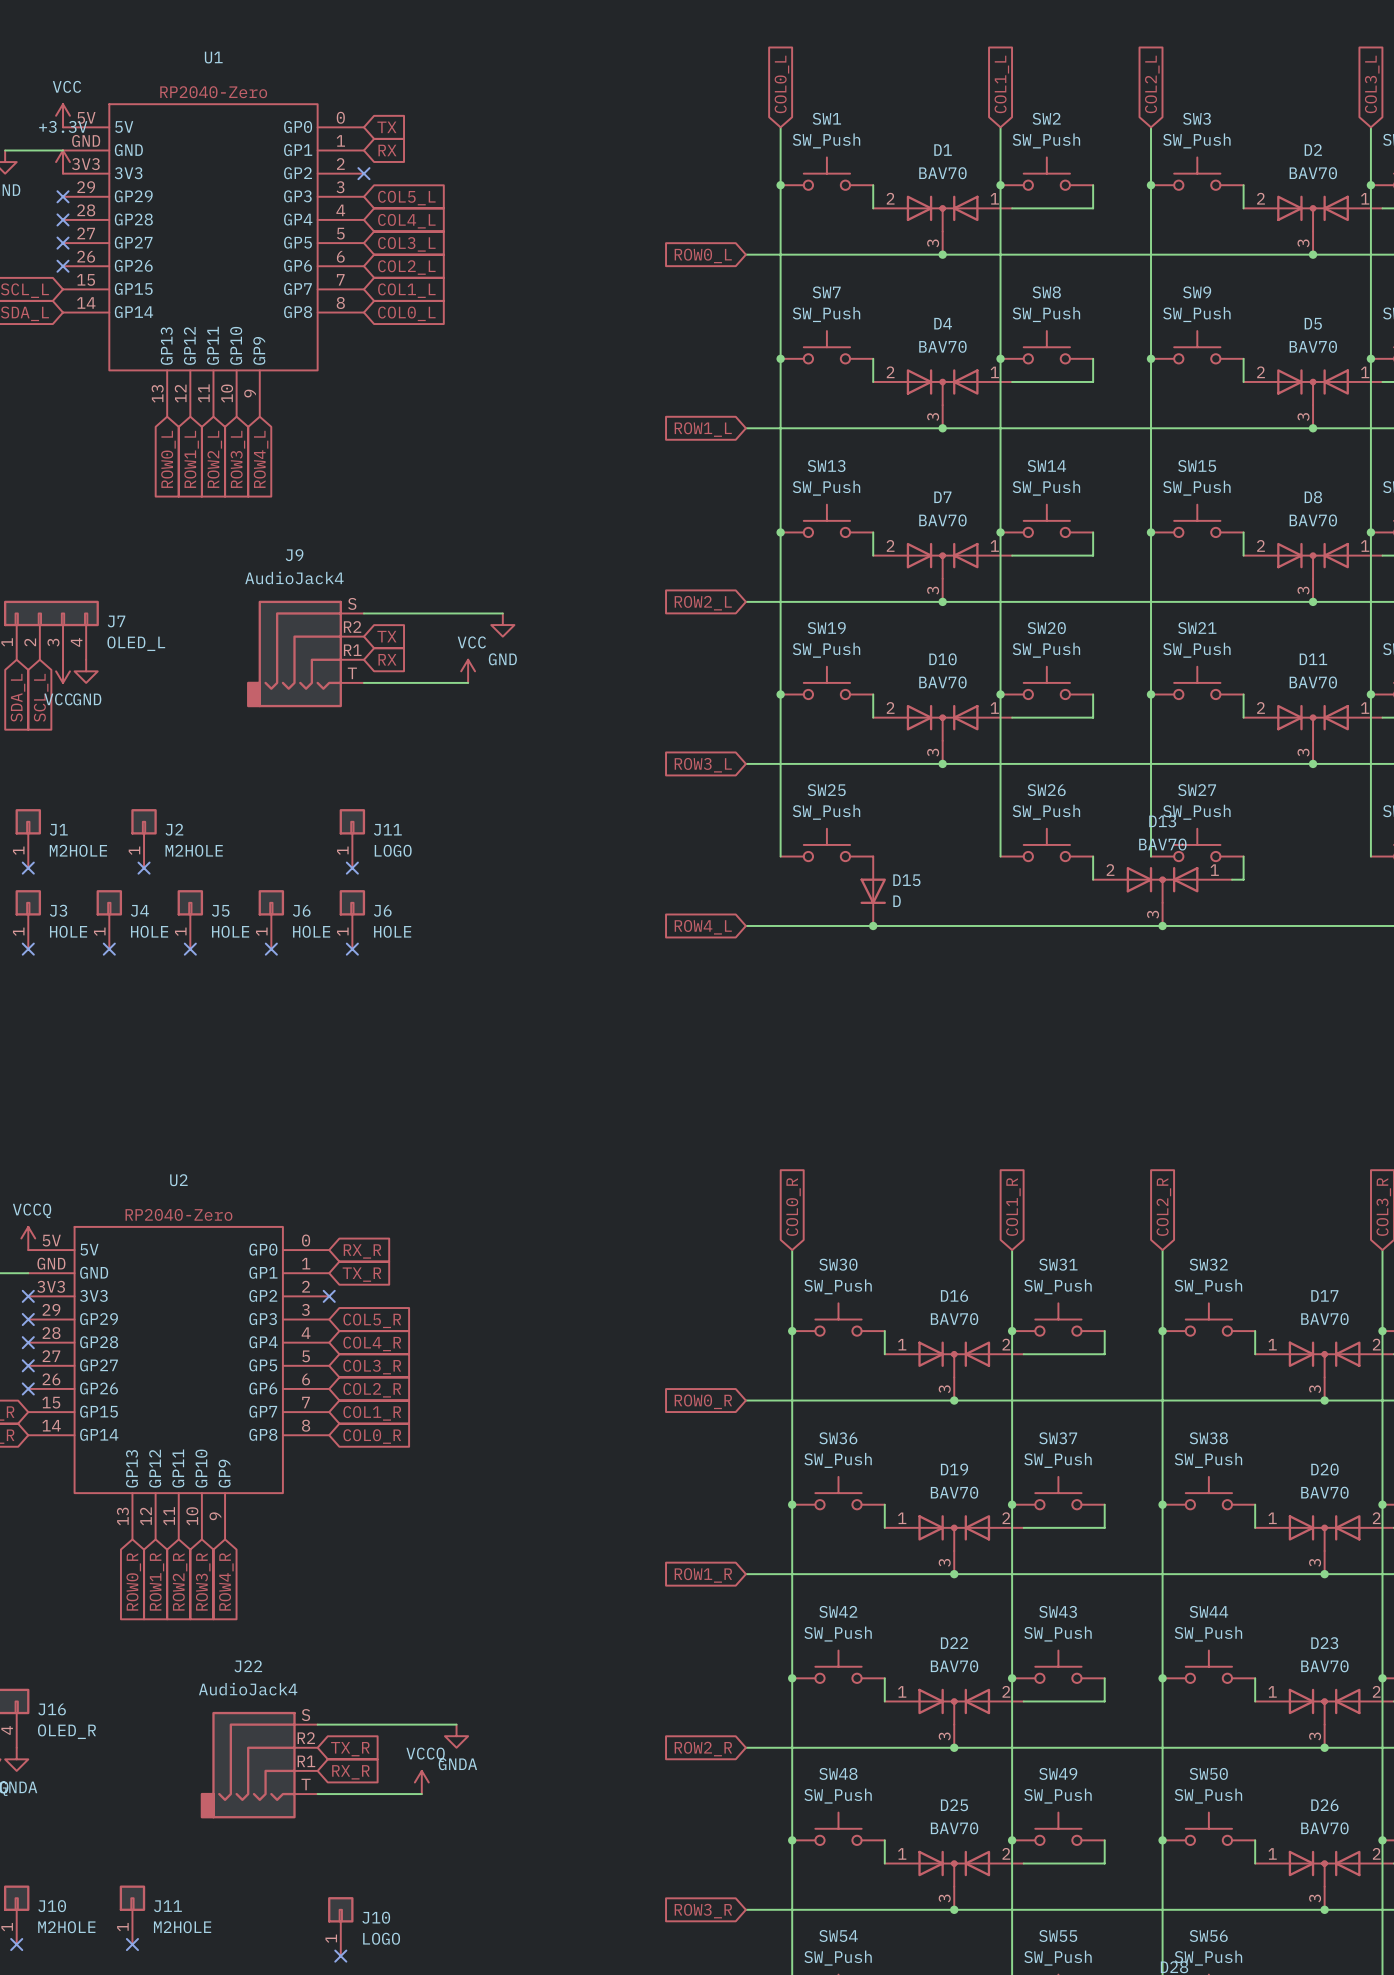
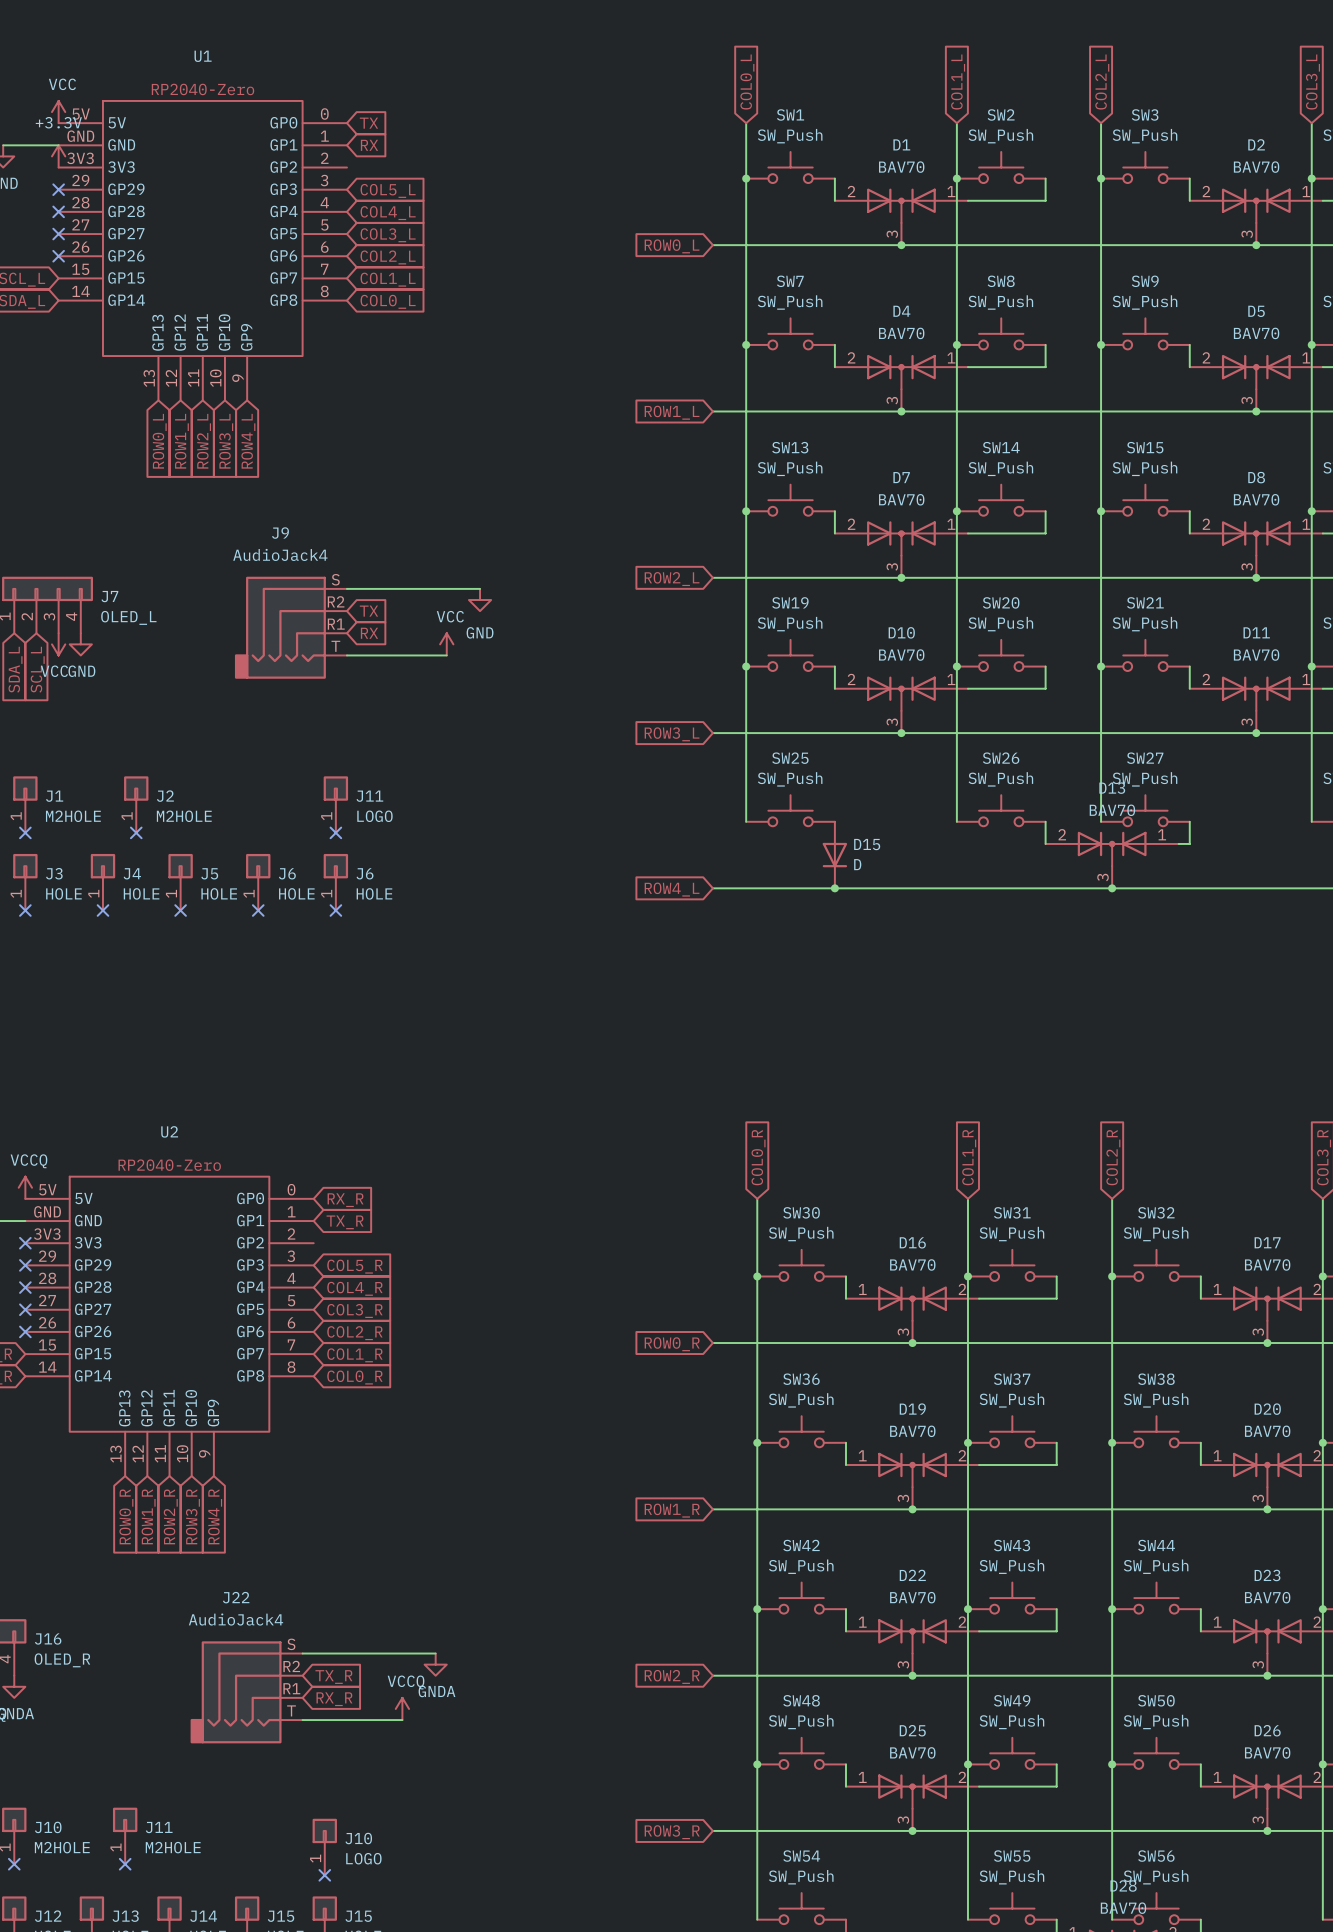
no-connect mark: (363, 173) -> none
no-connect mark: (329, 1296) -> none

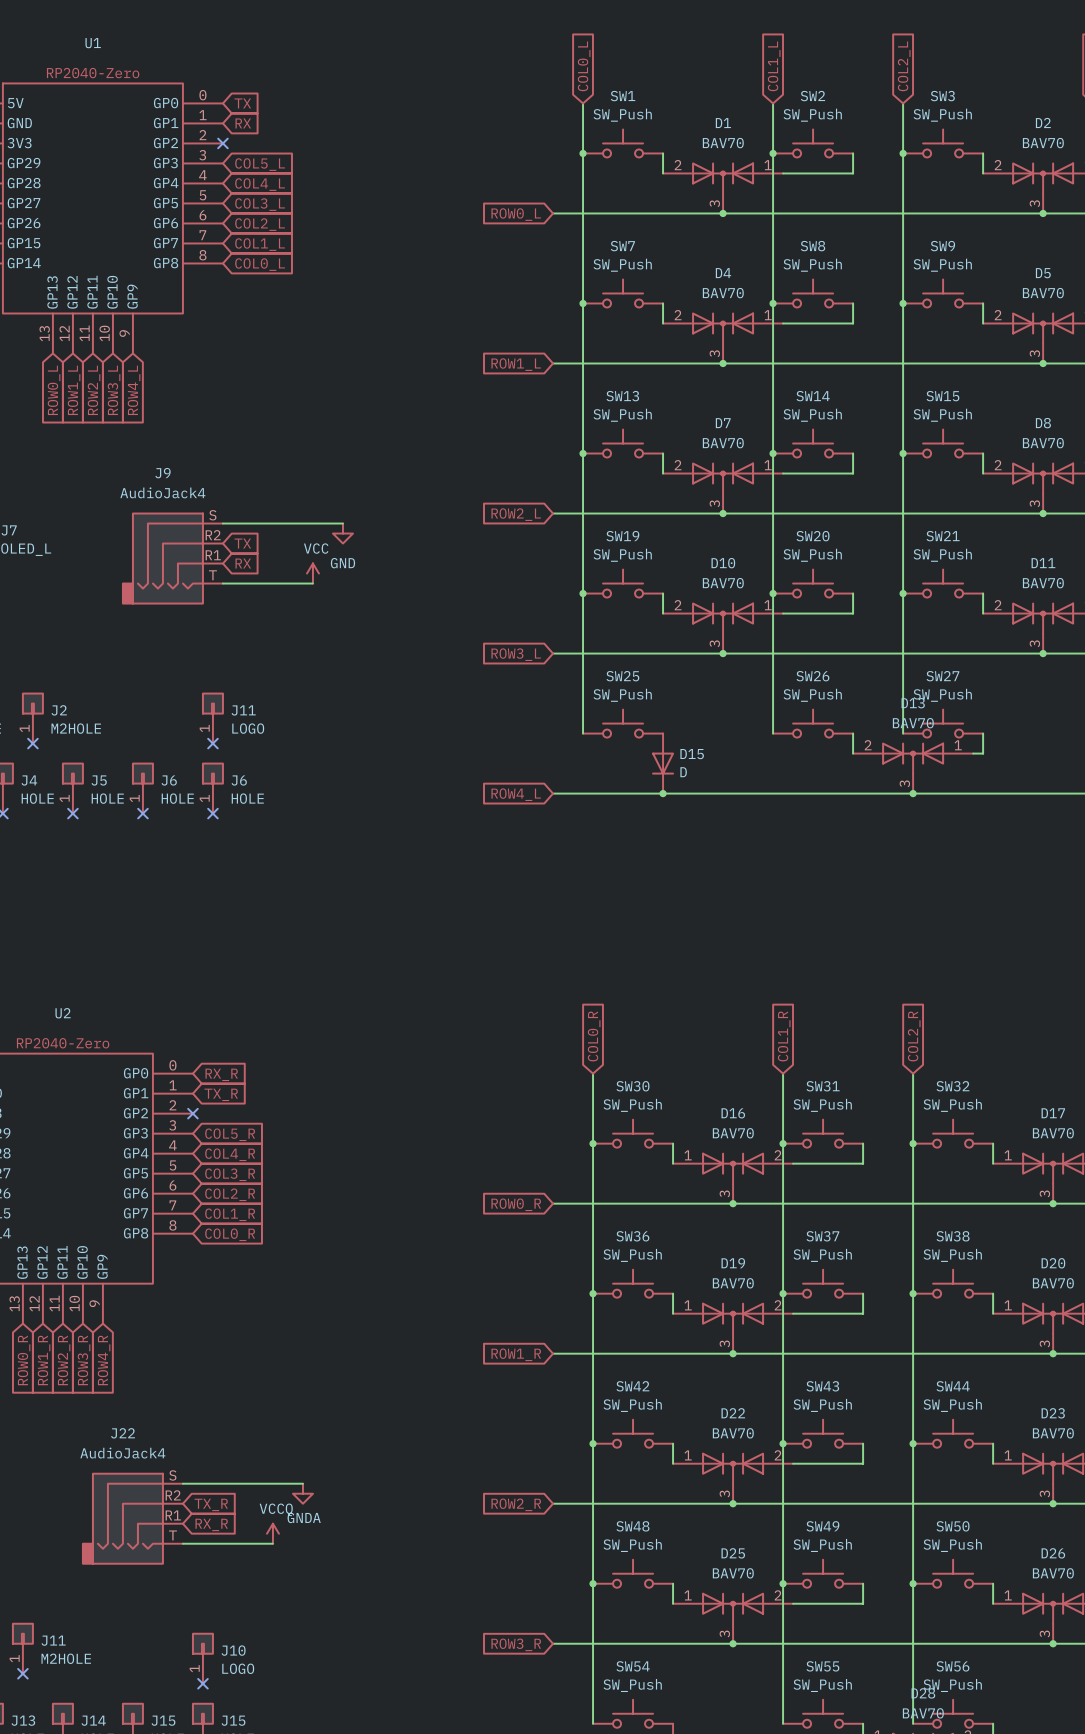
no-connect mark: none -> (222, 143)
no-connect mark: none -> (192, 1113)

